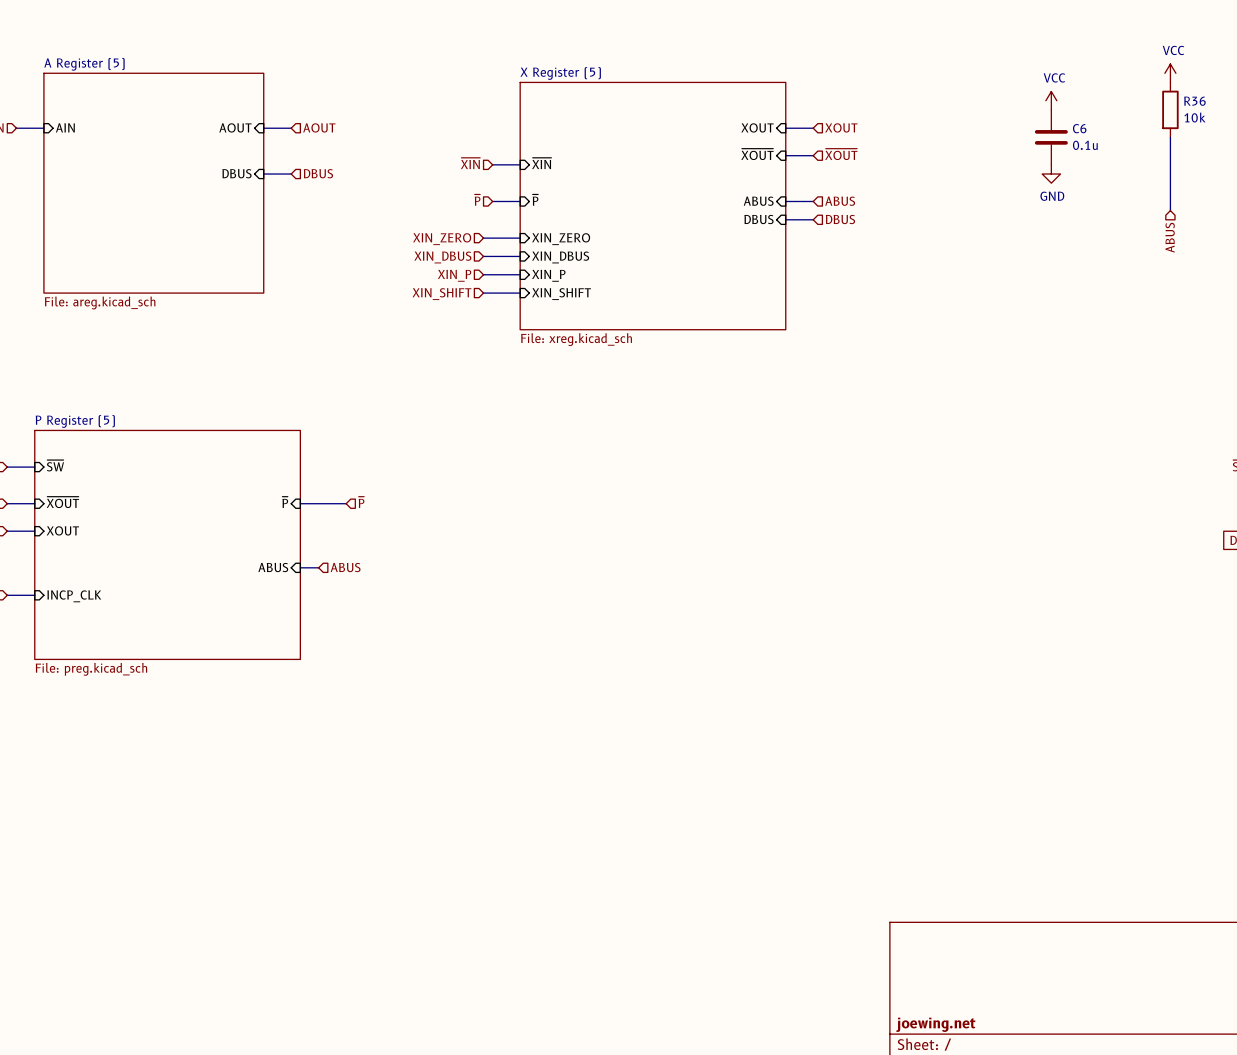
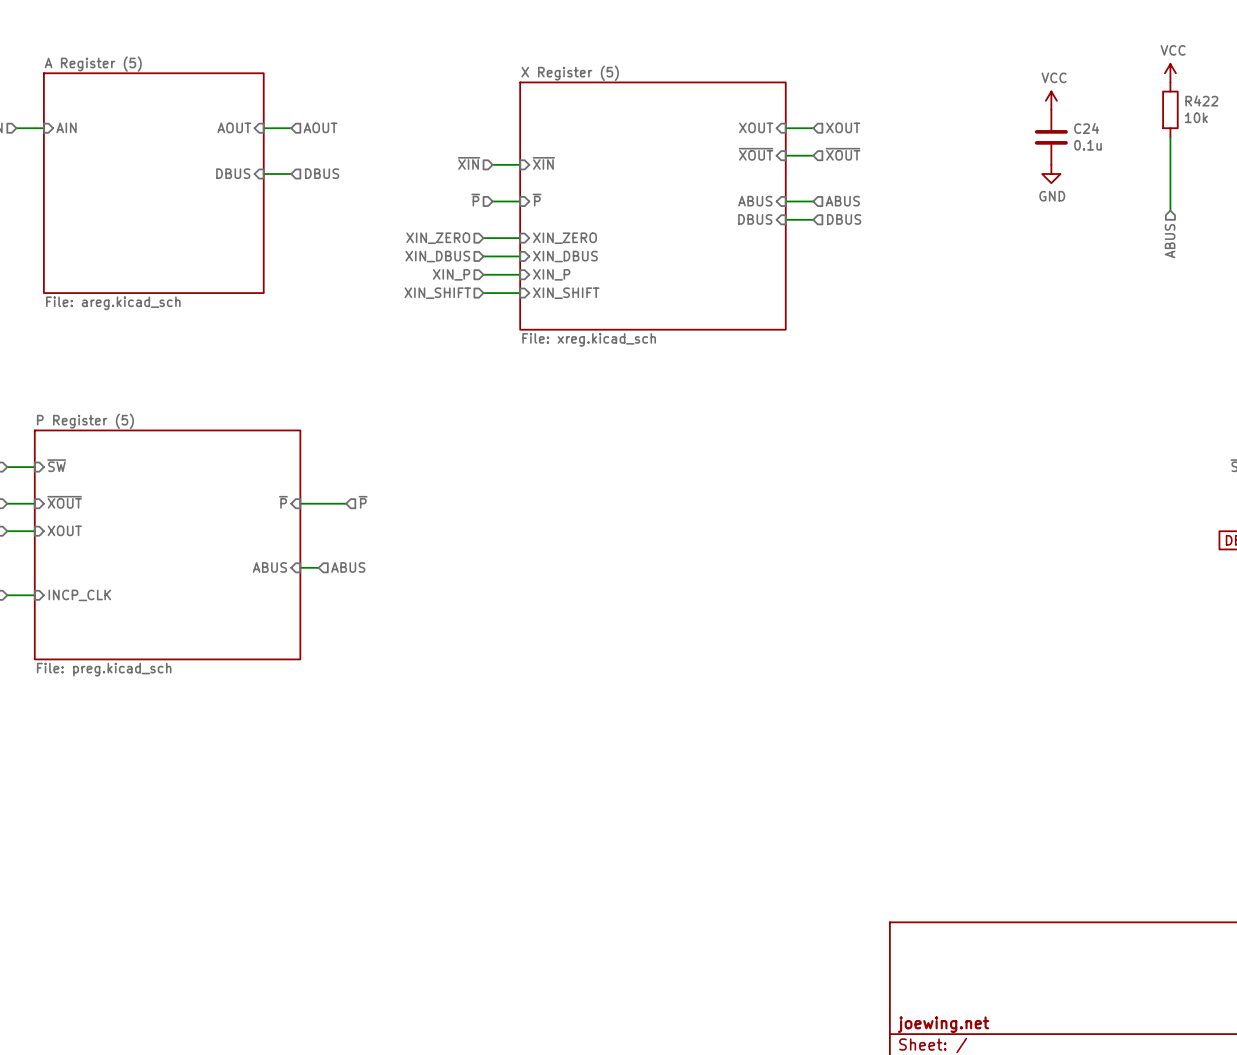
R36 name: R36 (1194, 101) -> R422 (1201, 100)
C6 name: C6 (1079, 128) -> C24 (1086, 128)

